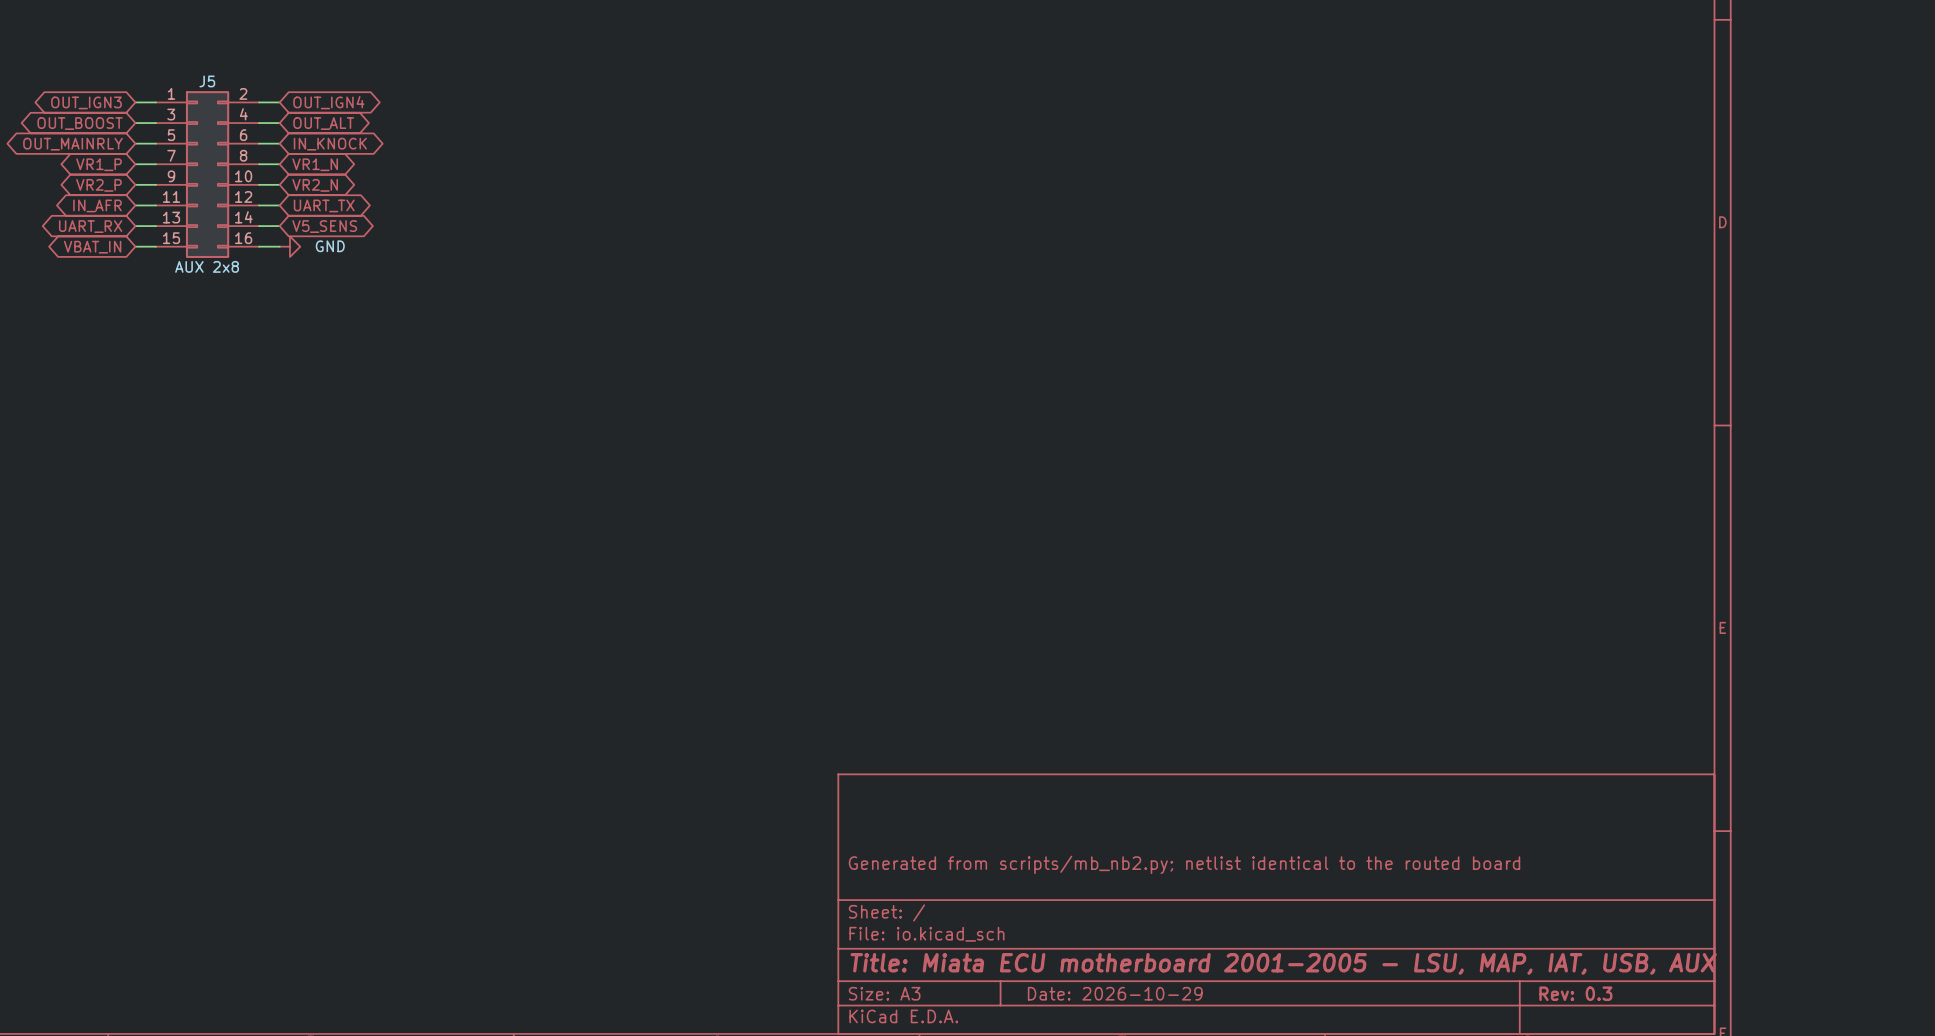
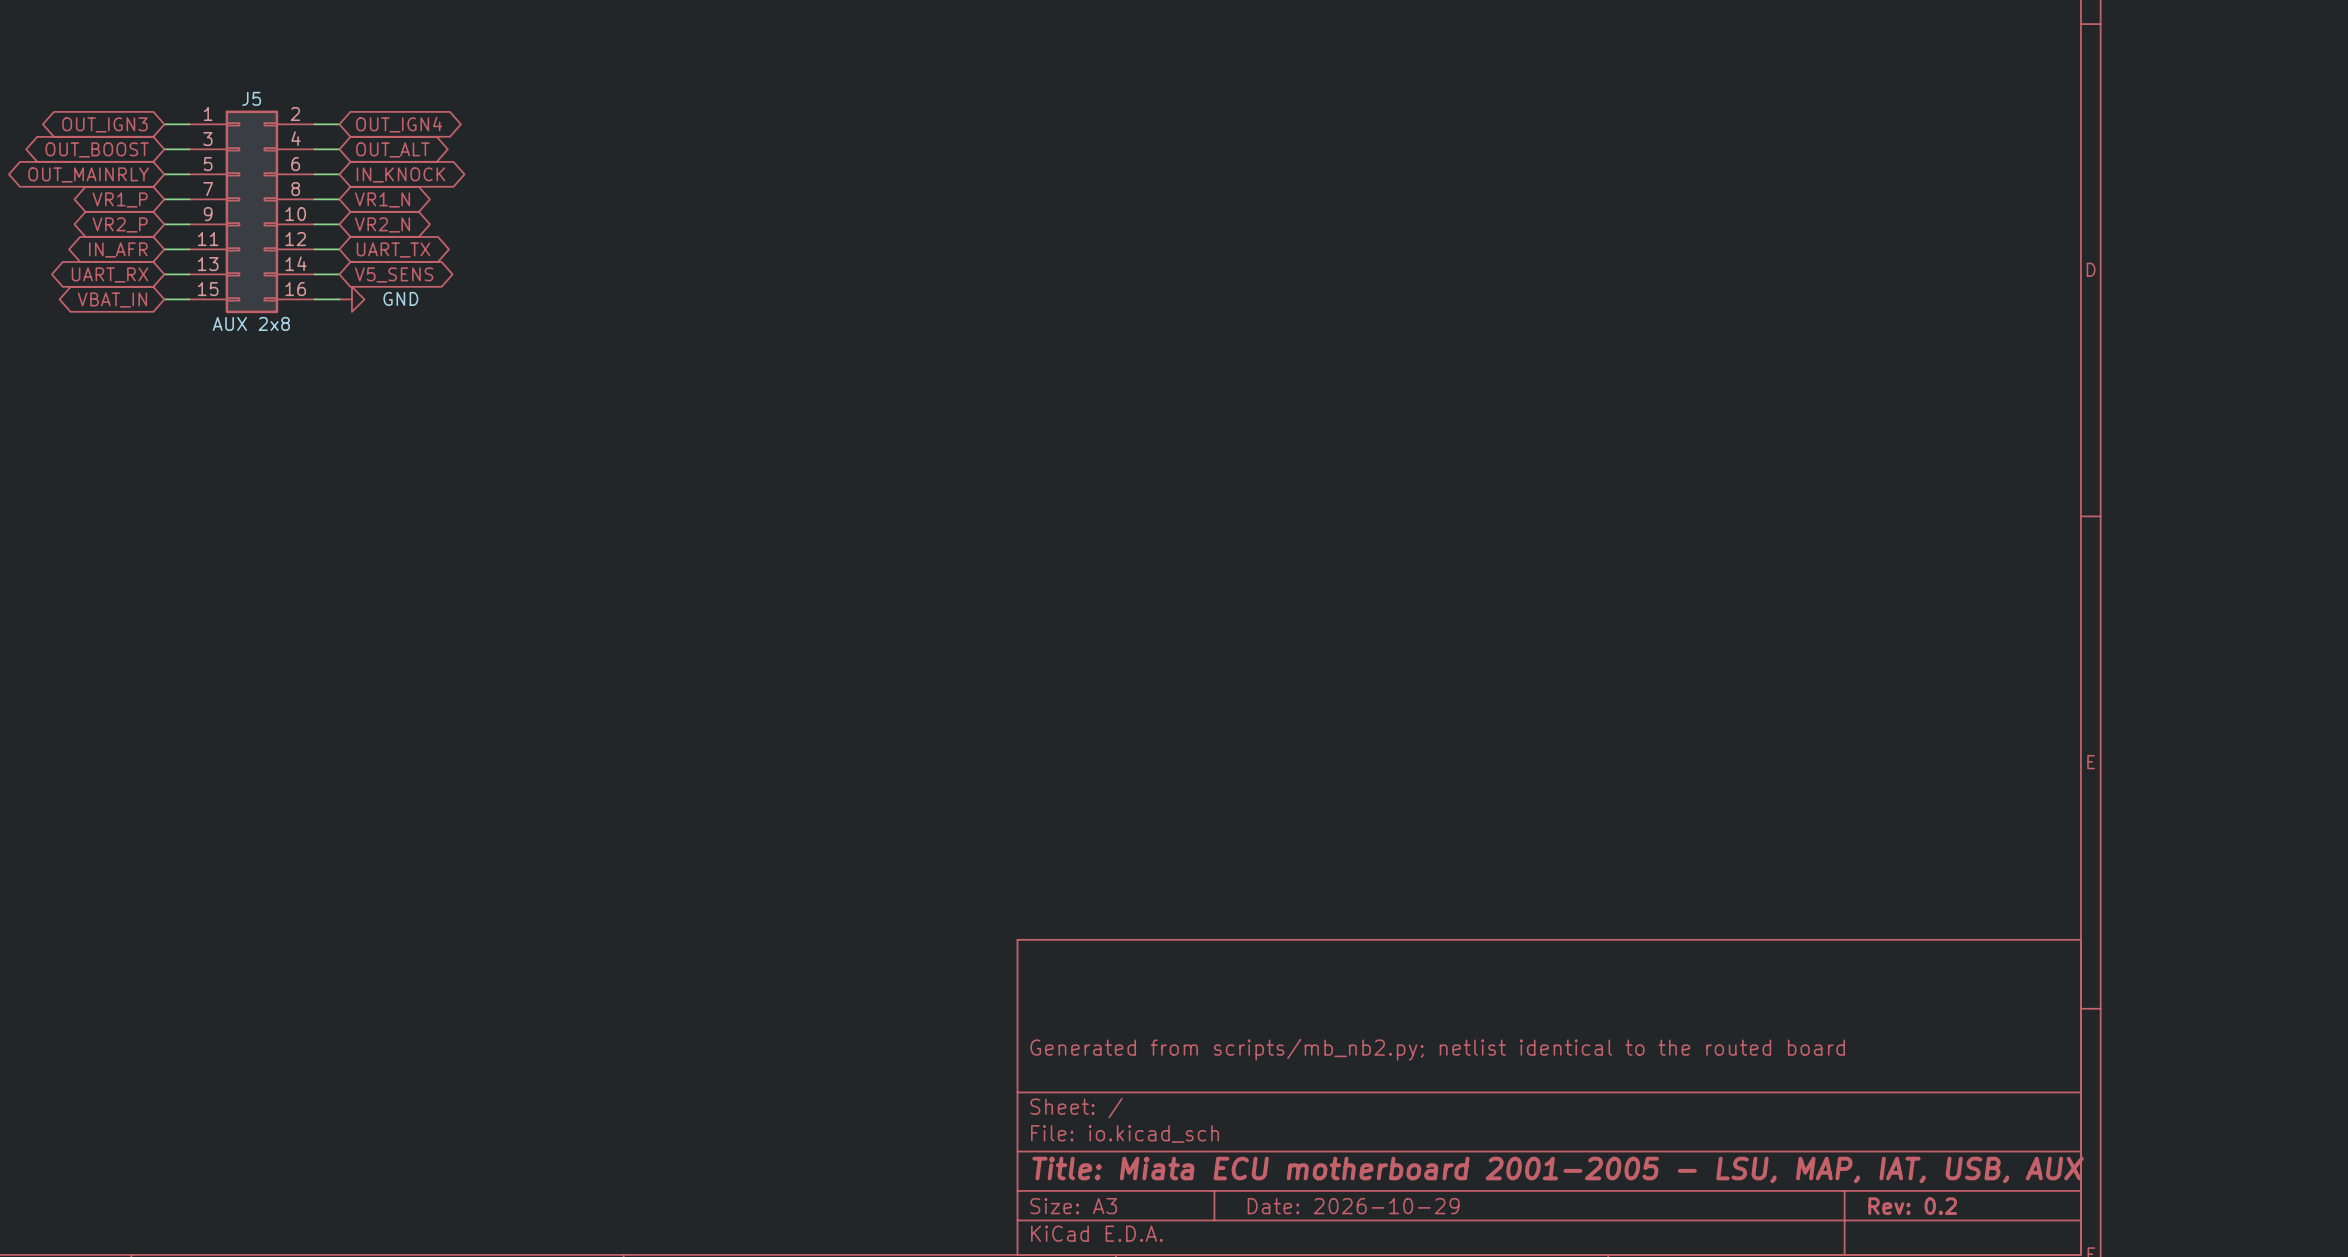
title block: Rev: 0.3 (1575, 993) -> Rev: 0.2 (1912, 1206)

